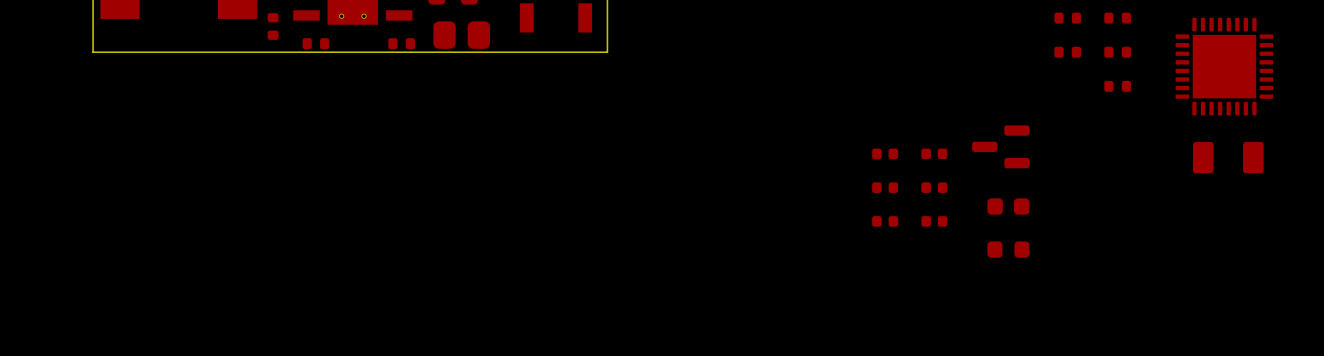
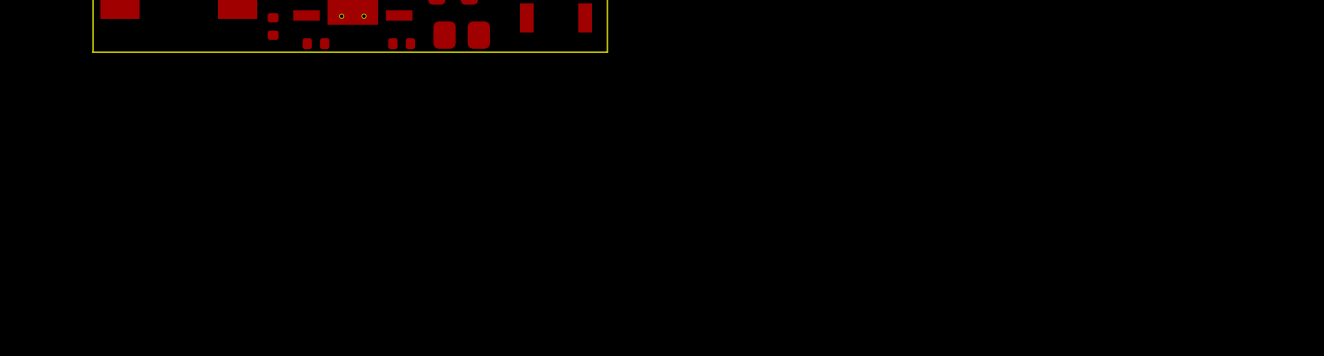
part: (1067, 18) -> none
part: (1117, 18) -> none
part: (1067, 52) -> none
part: (1117, 52) -> none
part: (1224, 66) -> none
part: (1117, 86) -> none
part: (1000, 146) -> none
part: (885, 153) -> none
part: (934, 153) -> none
part: (1228, 157) -> none
part: (885, 187) -> none
part: (934, 187) -> none
part: (1008, 206) -> none
part: (885, 221) -> none
part: (934, 221) -> none
part: (1008, 249) -> none

